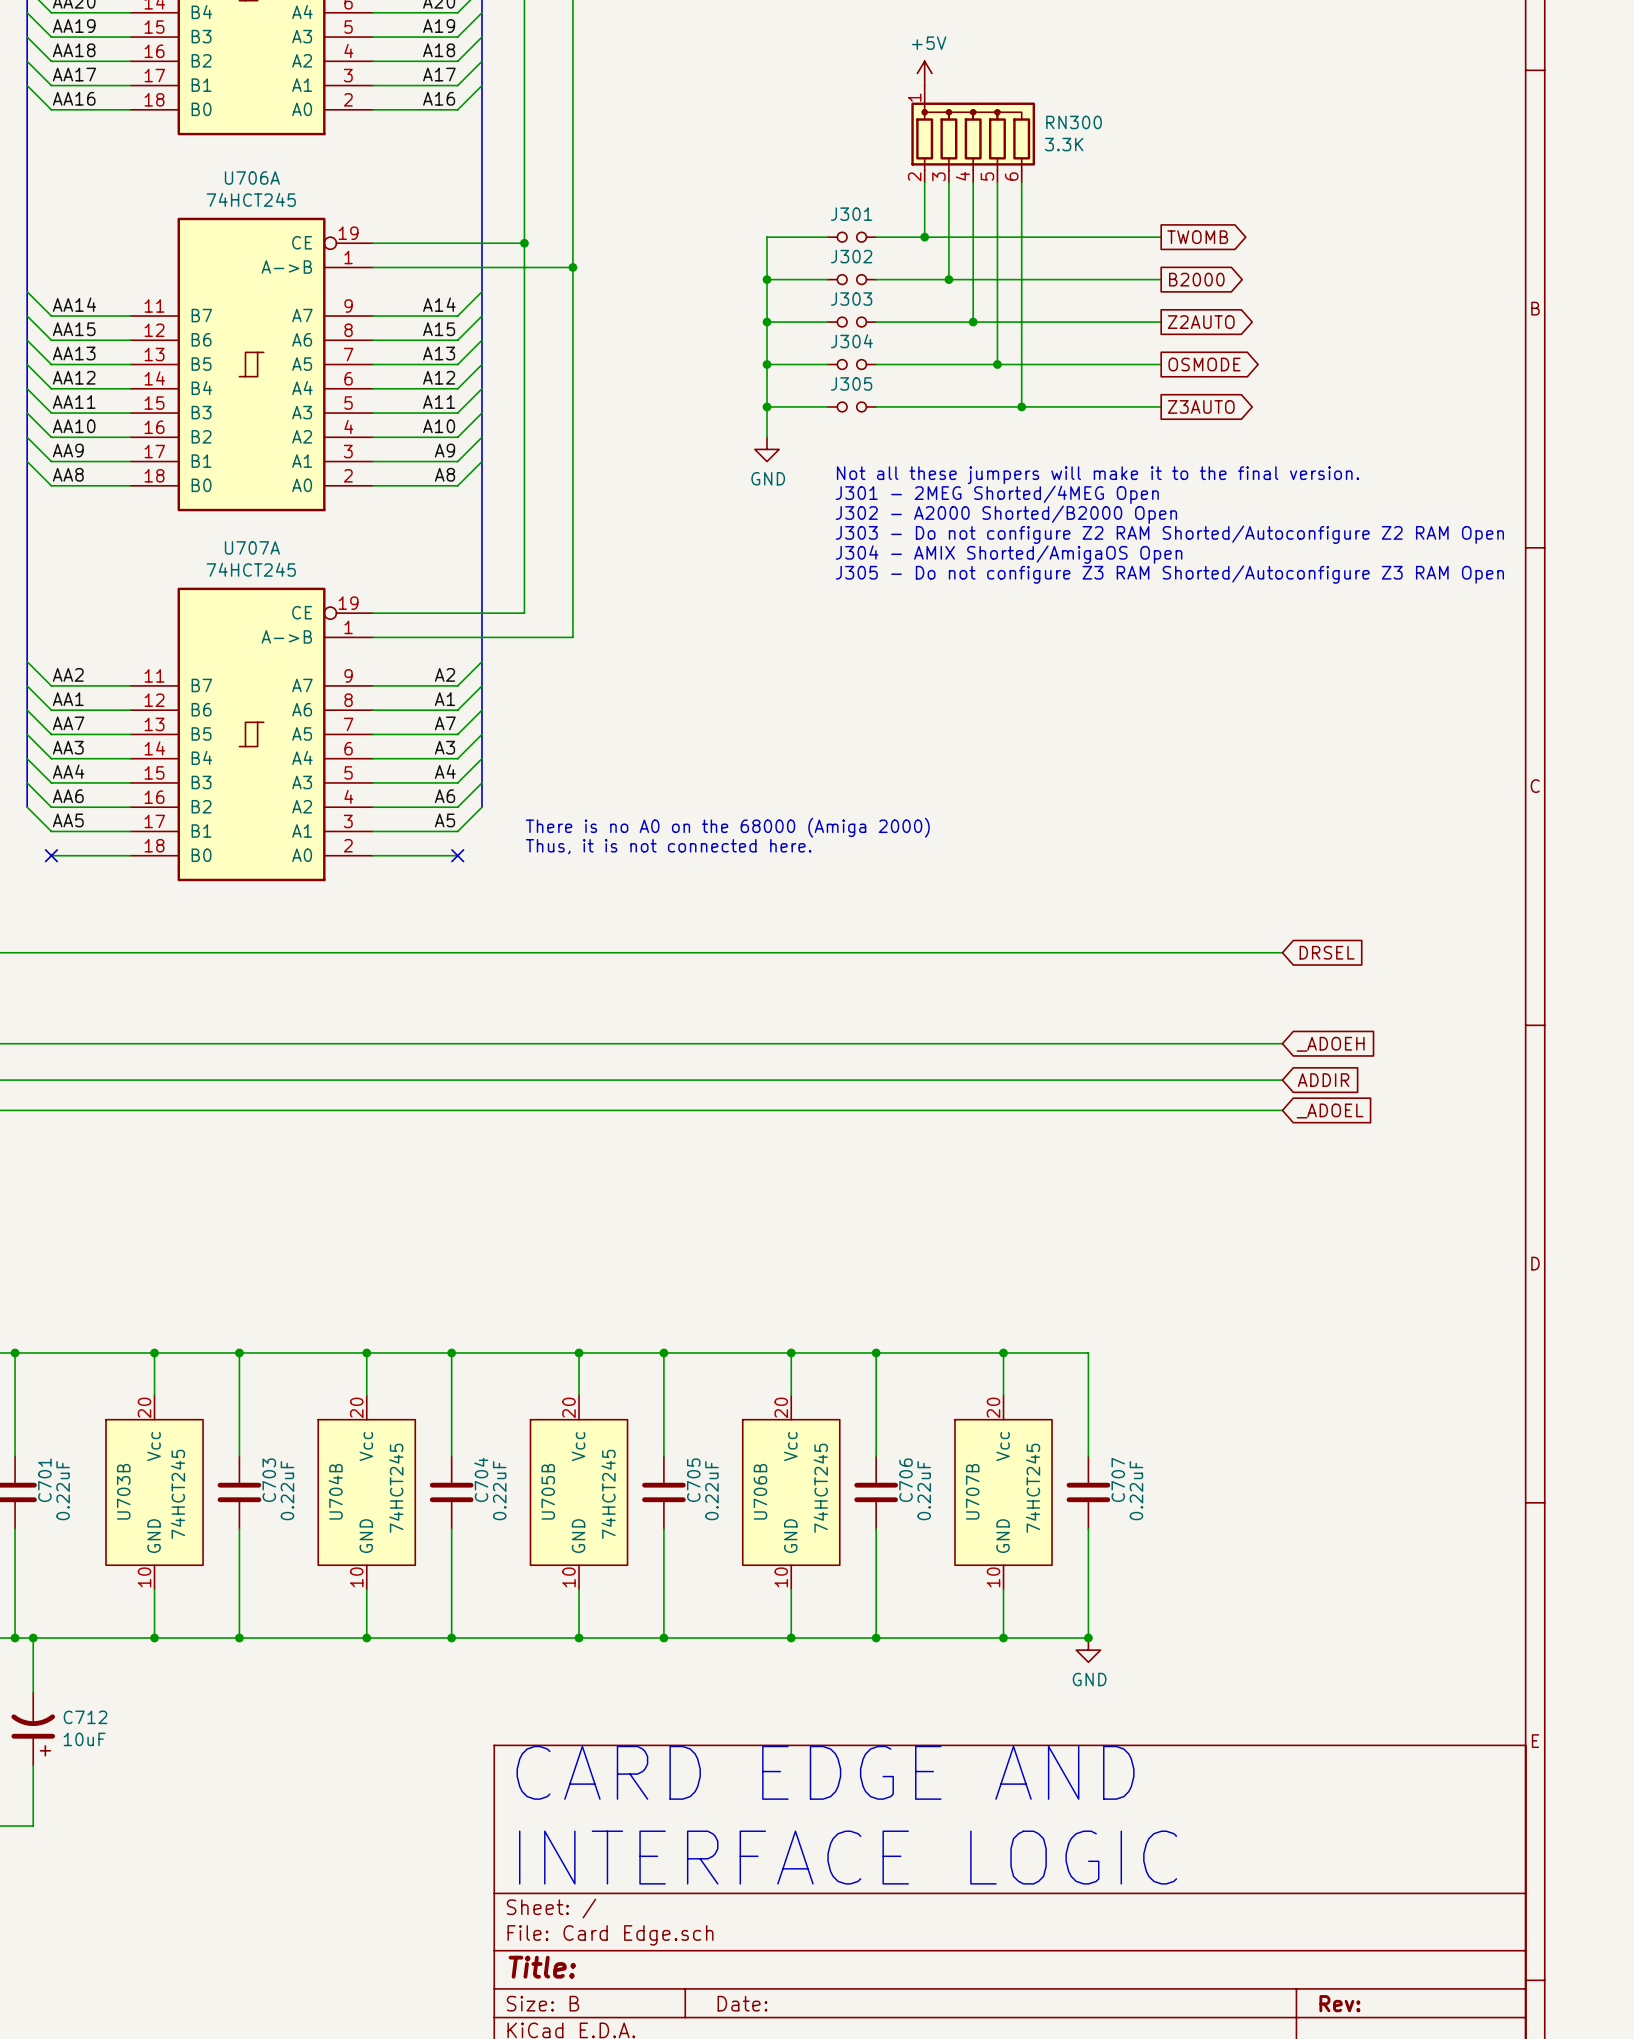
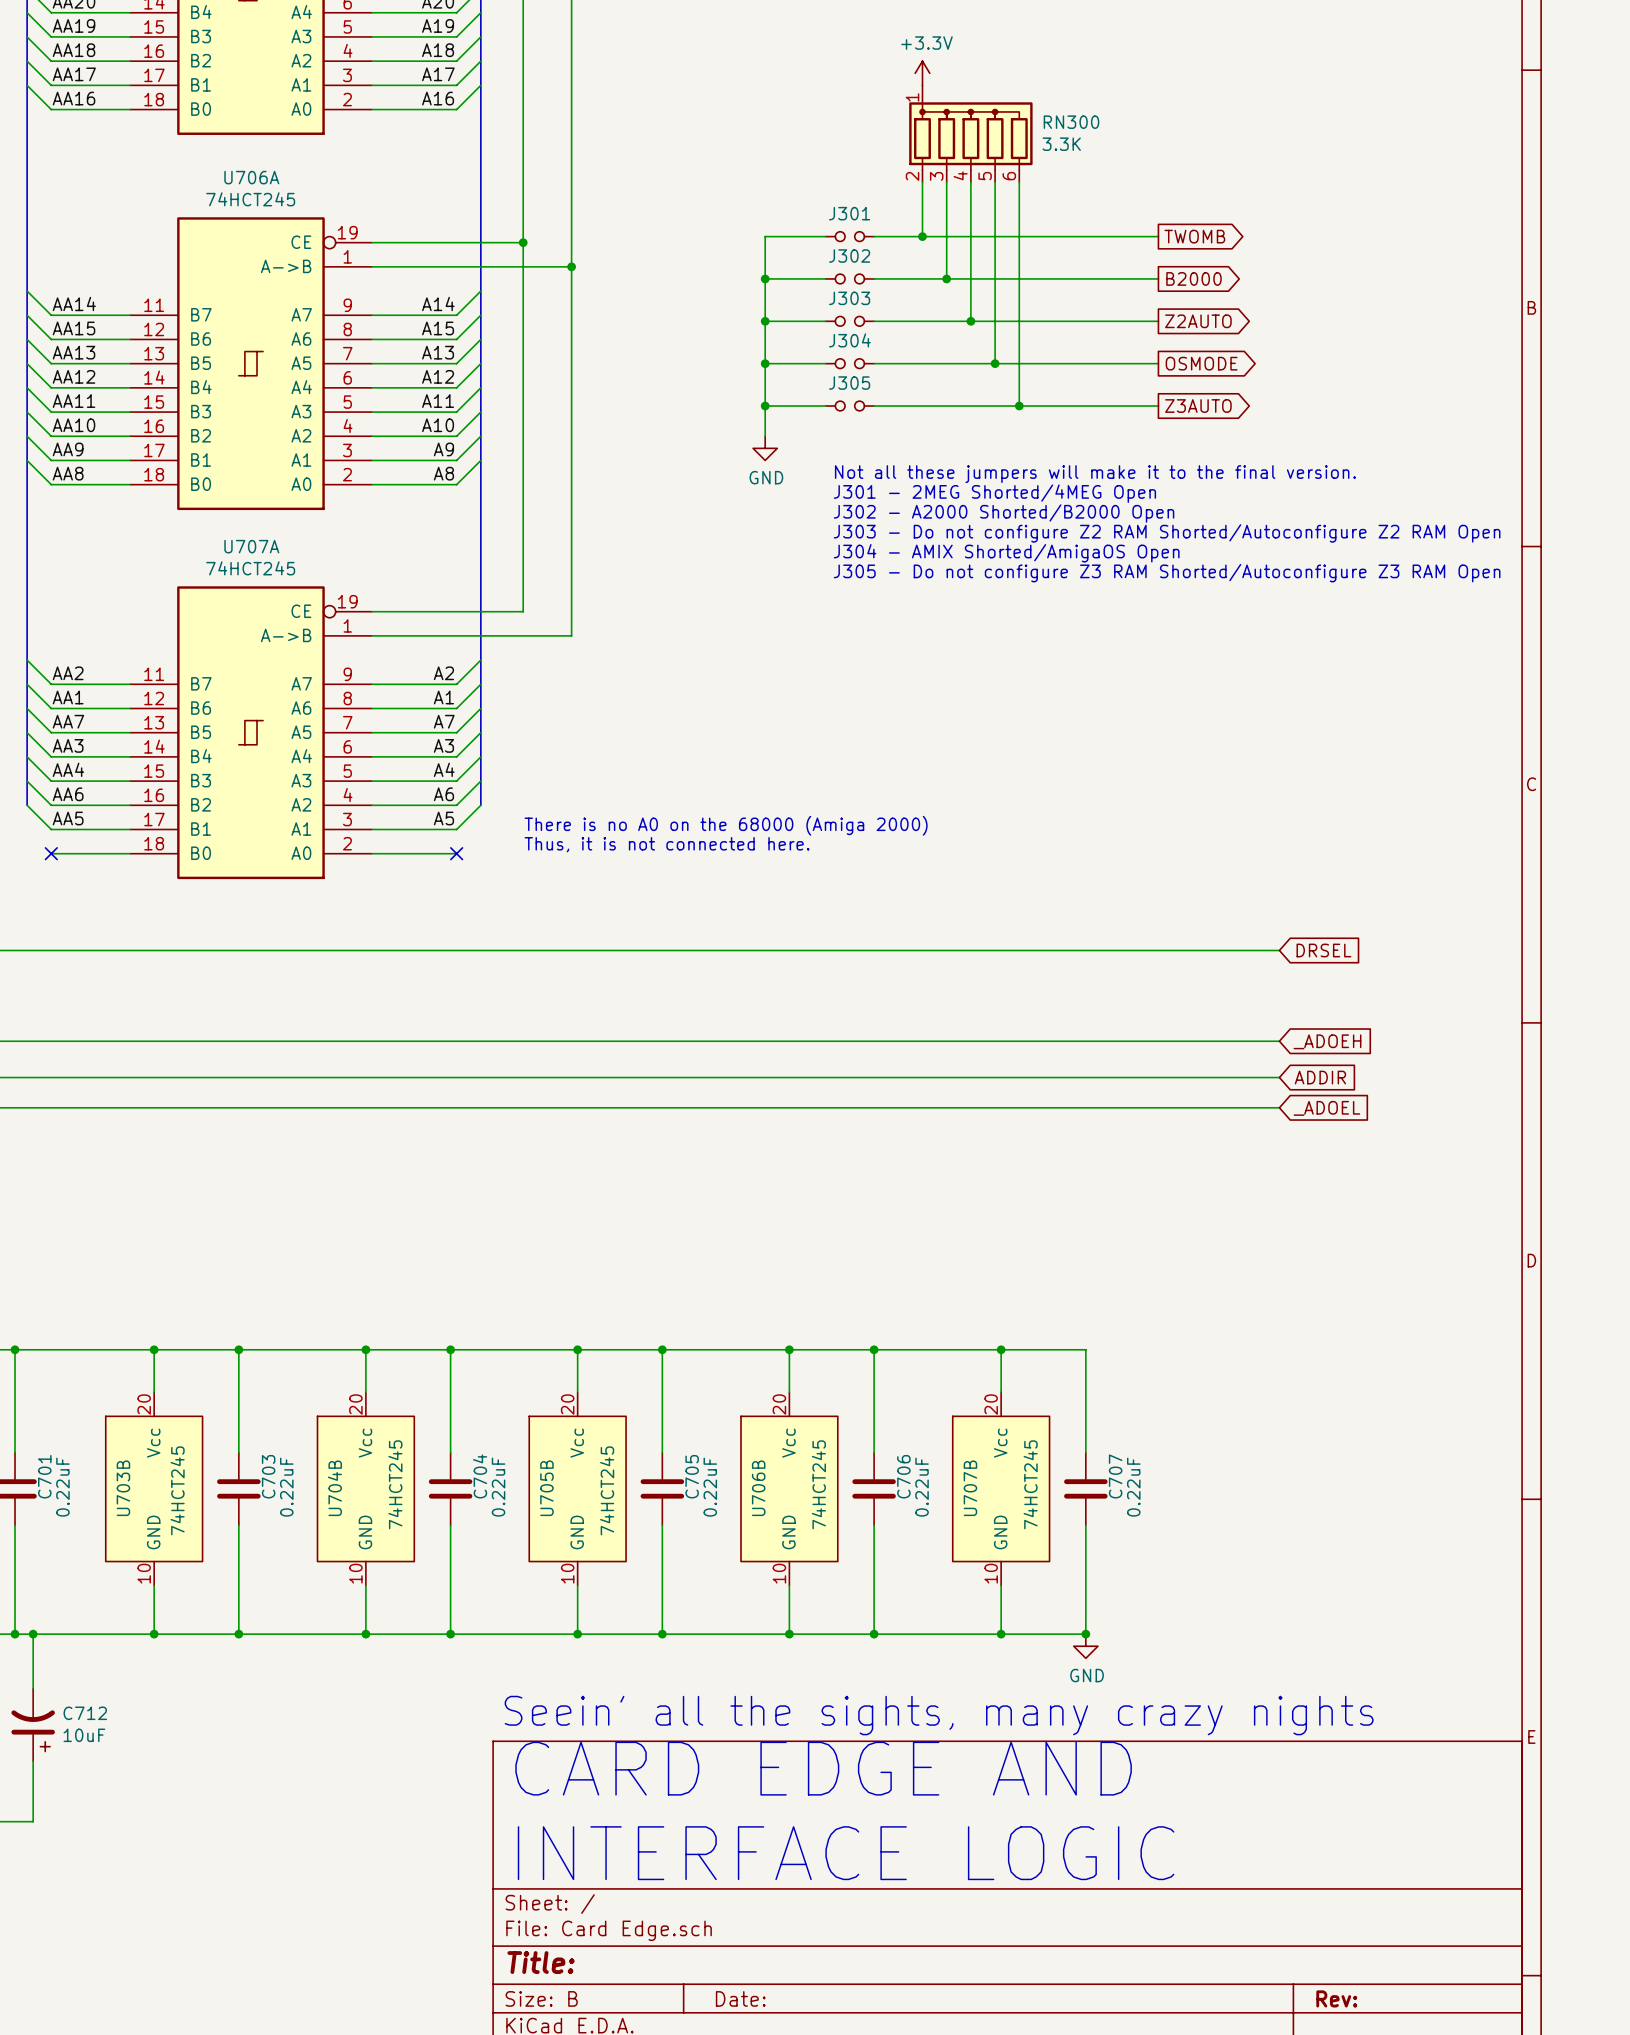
power symbol: +5V (924, 73) -> +3.3V (922, 73)
text: none -> Seein' all the sights, many crazy nights (939, 1715)

